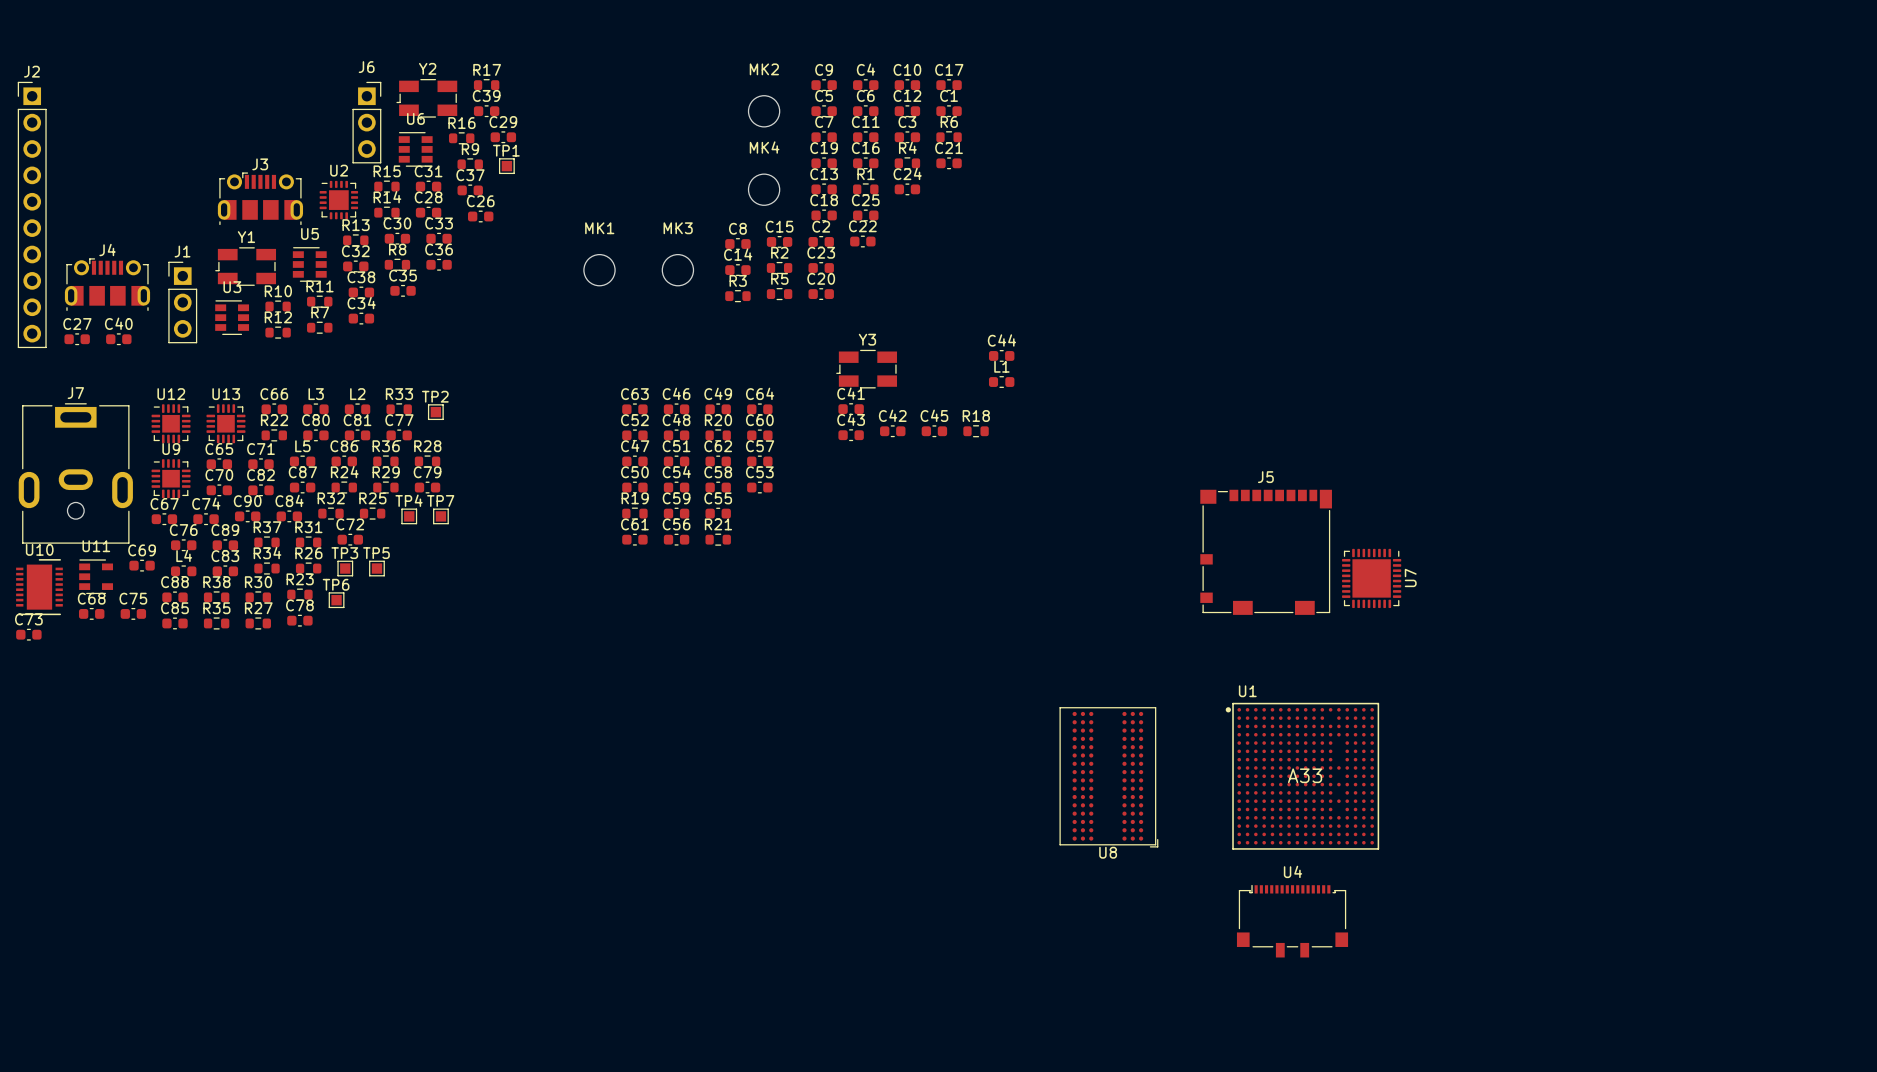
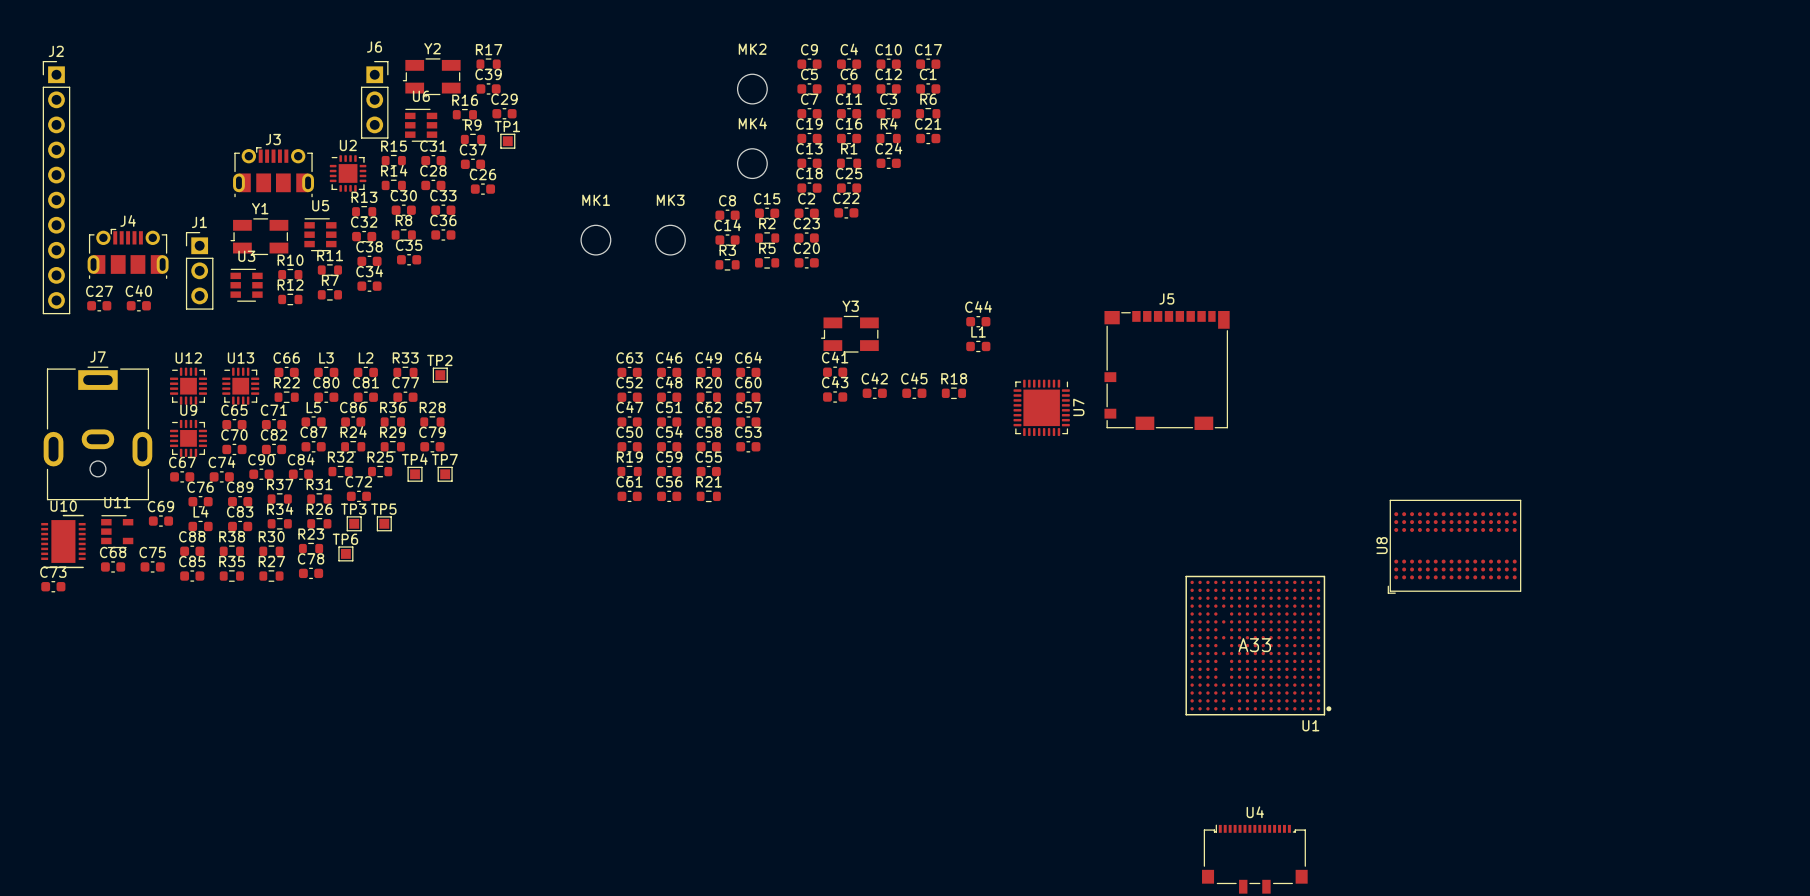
J5 position: (1266, 552) -> (1167, 370)
U7 position: (1371, 578) -> (1041, 407)
U1 rotation: 0° (1302, 776) -> 180° (1258, 645)
U8 rotation: 0° (1108, 777) -> 90° clockwise (1454, 546)
U8 position: (1108, 777) -> (1454, 546)

